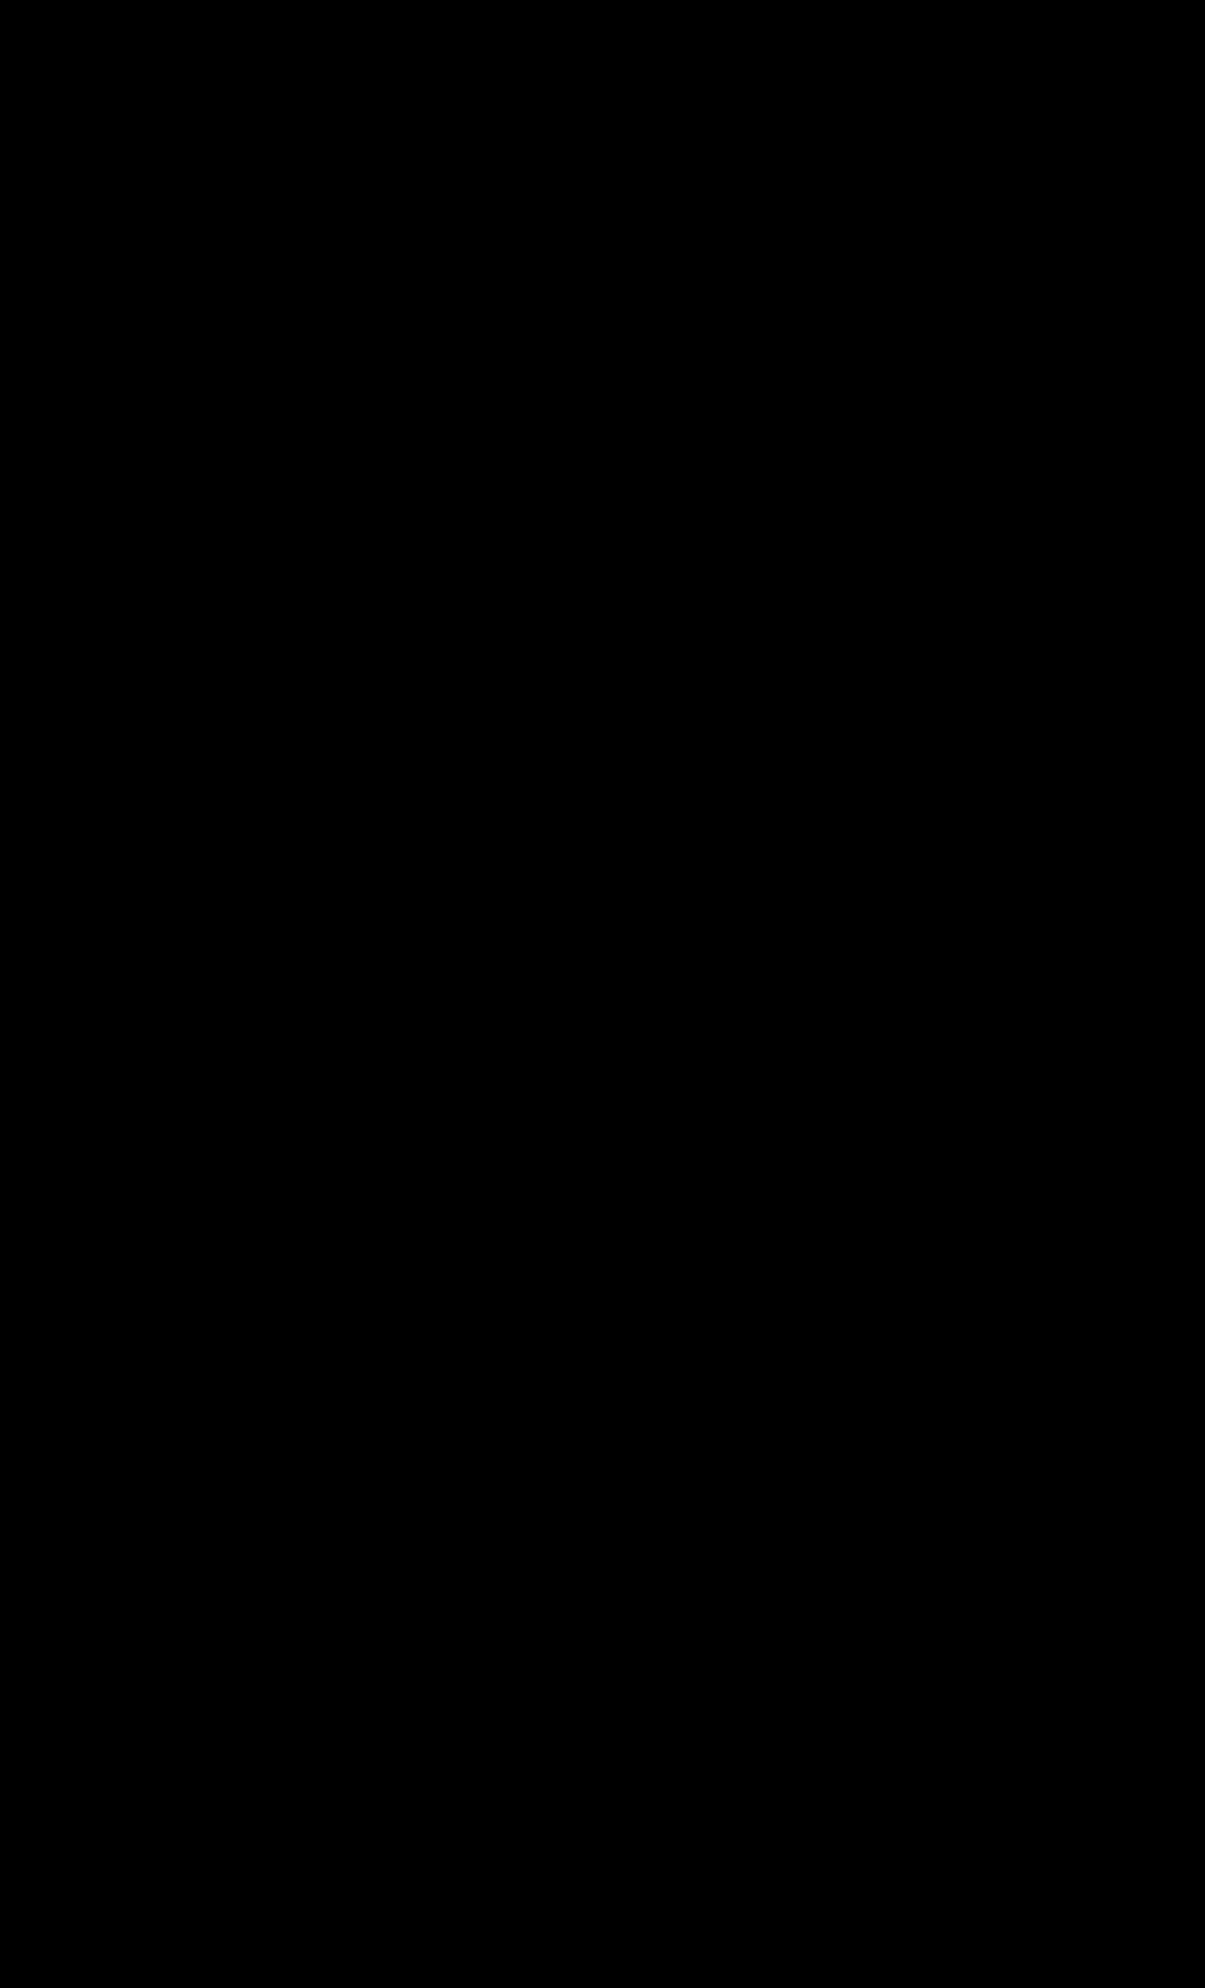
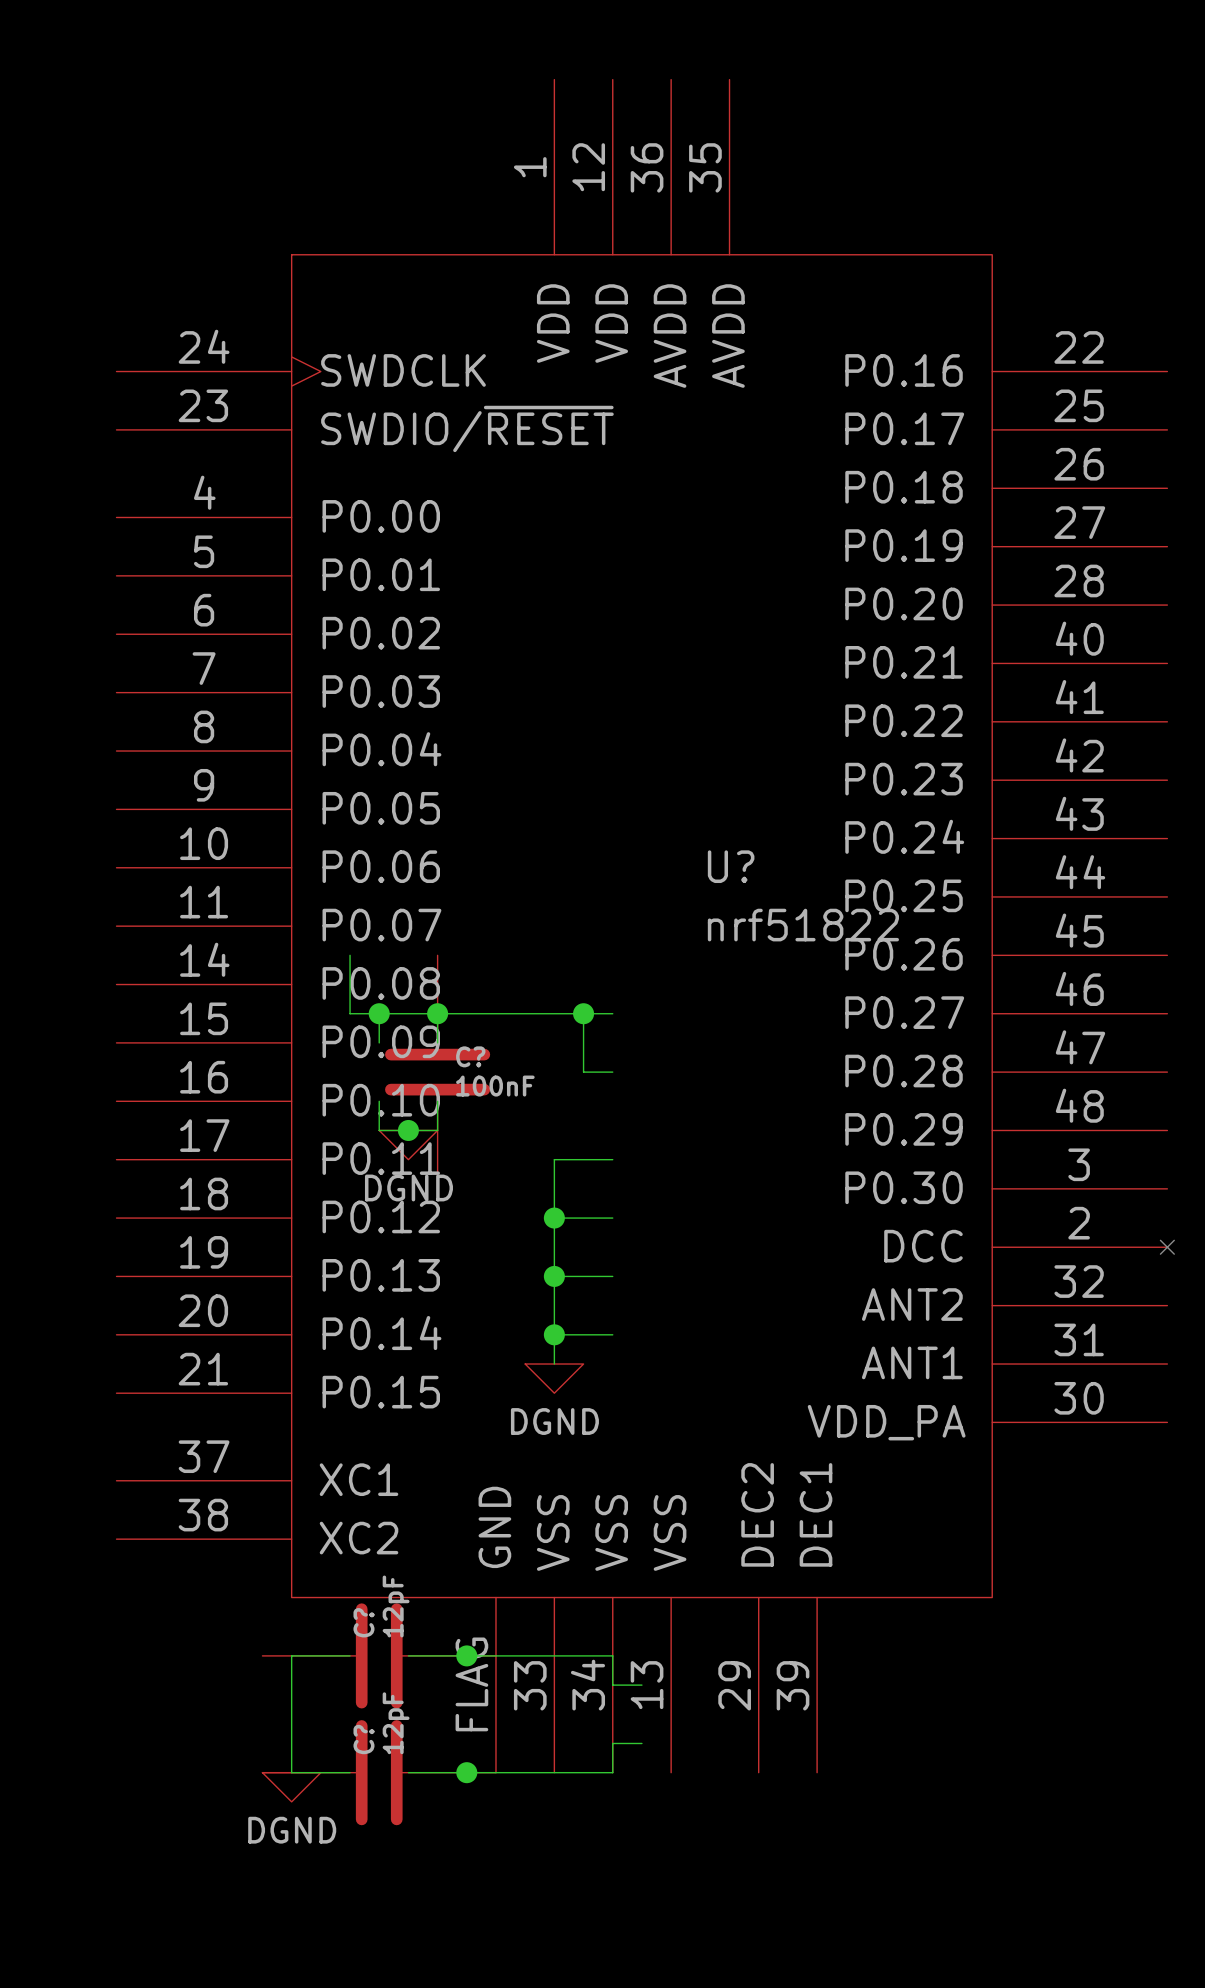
U?: none -> nrf51822 (645, 926)
wire: none -> (350, 955) (350, 1013) (612, 1013)
wire: none -> (379, 1013) (379, 1042)
junction: none -> (379, 1013)
wire: none -> (437, 1013) (437, 1042)
junction: none -> (437, 1013)
wire: none -> (583, 1013) (583, 1072) (612, 1072)
junction: none -> (583, 1013)
C?: none -> 100nF (437, 1072)
wire: none -> (379, 1101) (379, 1130) (437, 1130) (437, 1101)
junction: none -> (408, 1130)
power symbol: none -> DGND (408, 1145)
wire: none -> (612, 1159) (554, 1159) (554, 1364)
wire: none -> (554, 1218) (612, 1218)
junction: none -> (554, 1218)
wire: none -> (554, 1276) (612, 1276)
junction: none -> (554, 1276)
wire: none -> (554, 1334) (612, 1334)
junction: none -> (554, 1334)
power symbol: none -> DGND (554, 1378)
wire: none -> (350, 1655) (291, 1655) (291, 1772) (350, 1772)
C?: none -> 12pF (379, 1655)
wire: none -> (408, 1655) (612, 1655) (612, 1685) (641, 1685)
junction: none -> (466, 1655)
wire: none -> (641, 1743) (612, 1743) (612, 1772) (408, 1772)
C?: none -> 12pF (379, 1772)
junction: none -> (466, 1772)
power symbol: none -> DGND (291, 1787)

